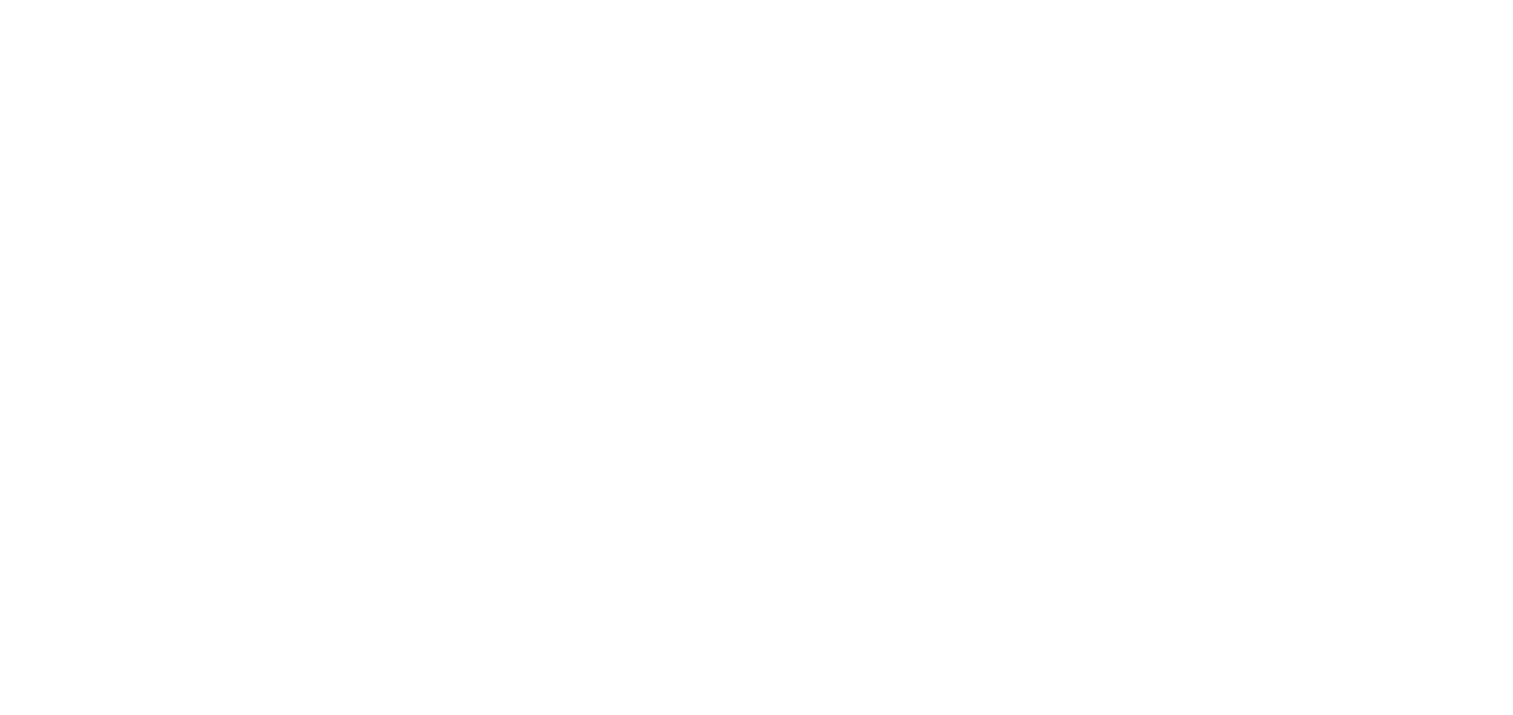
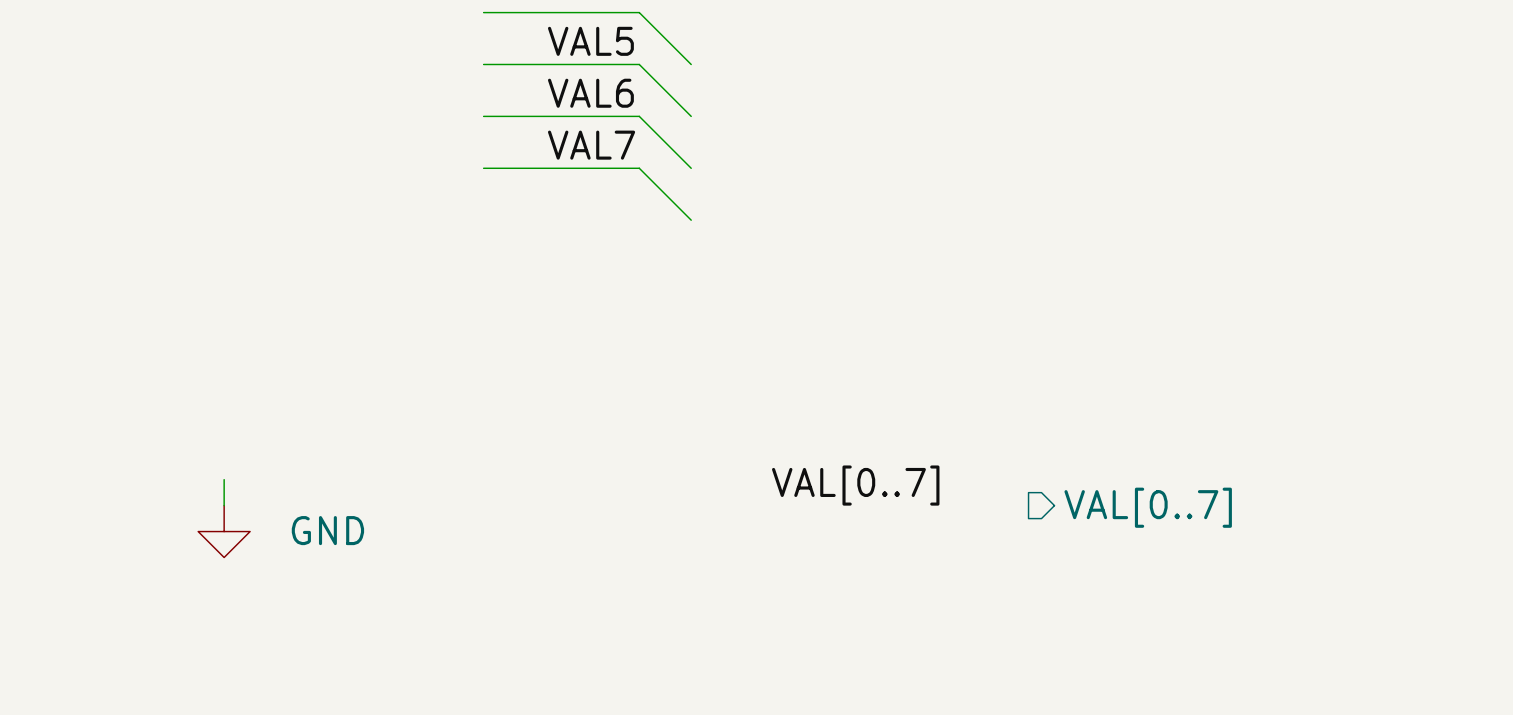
wire: none -> (483, 12) (639, 12) (691, 64)
label: none -> VAL5 (590, 41)
wire: none -> (483, 64) (639, 64) (691, 116)
label: none -> VAL6 (590, 93)
wire: none -> (483, 116) (639, 116) (691, 168)
label: none -> VAL7 (591, 145)
wire: none -> (483, 168) (639, 168) (691, 220)
wire: none -> (224, 479) (224, 505)
label: none -> VAL[0..7] (855, 485)
sheet pin: none -> VAL[0..7] (1148, 507)
power symbol: none -> GND (224, 531)

